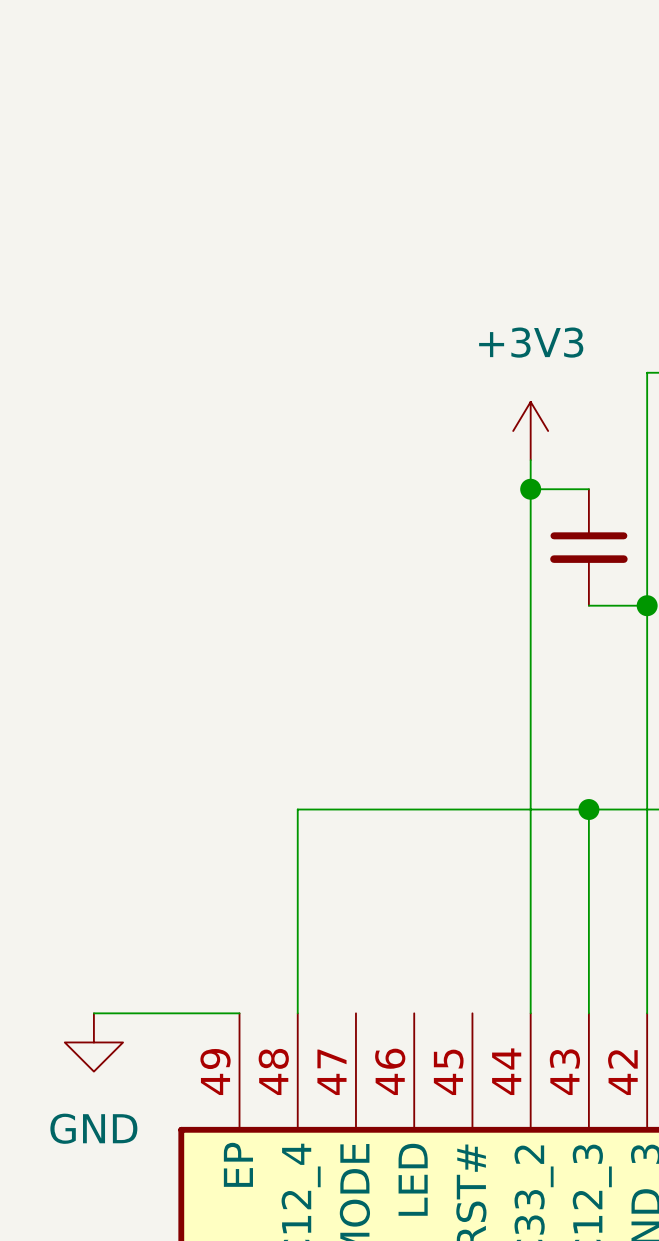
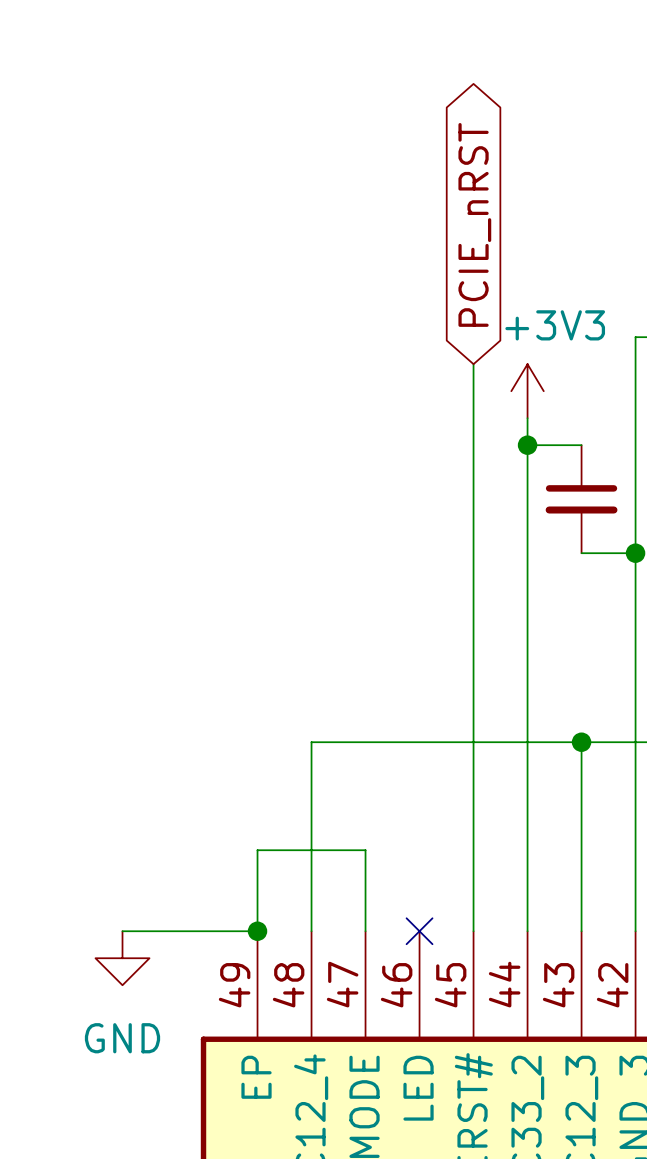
global label: none -> PCIE_nRST (474, 224)
power symbol text position: +3V3 (531, 342) -> +3V3 (555, 325)
wire: none -> (473, 364) (473, 931)
wire: none -> (257, 931) (257, 850) (365, 850) (365, 931)
junction: none -> (257, 931)
no-connect mark: none -> (419, 931)

